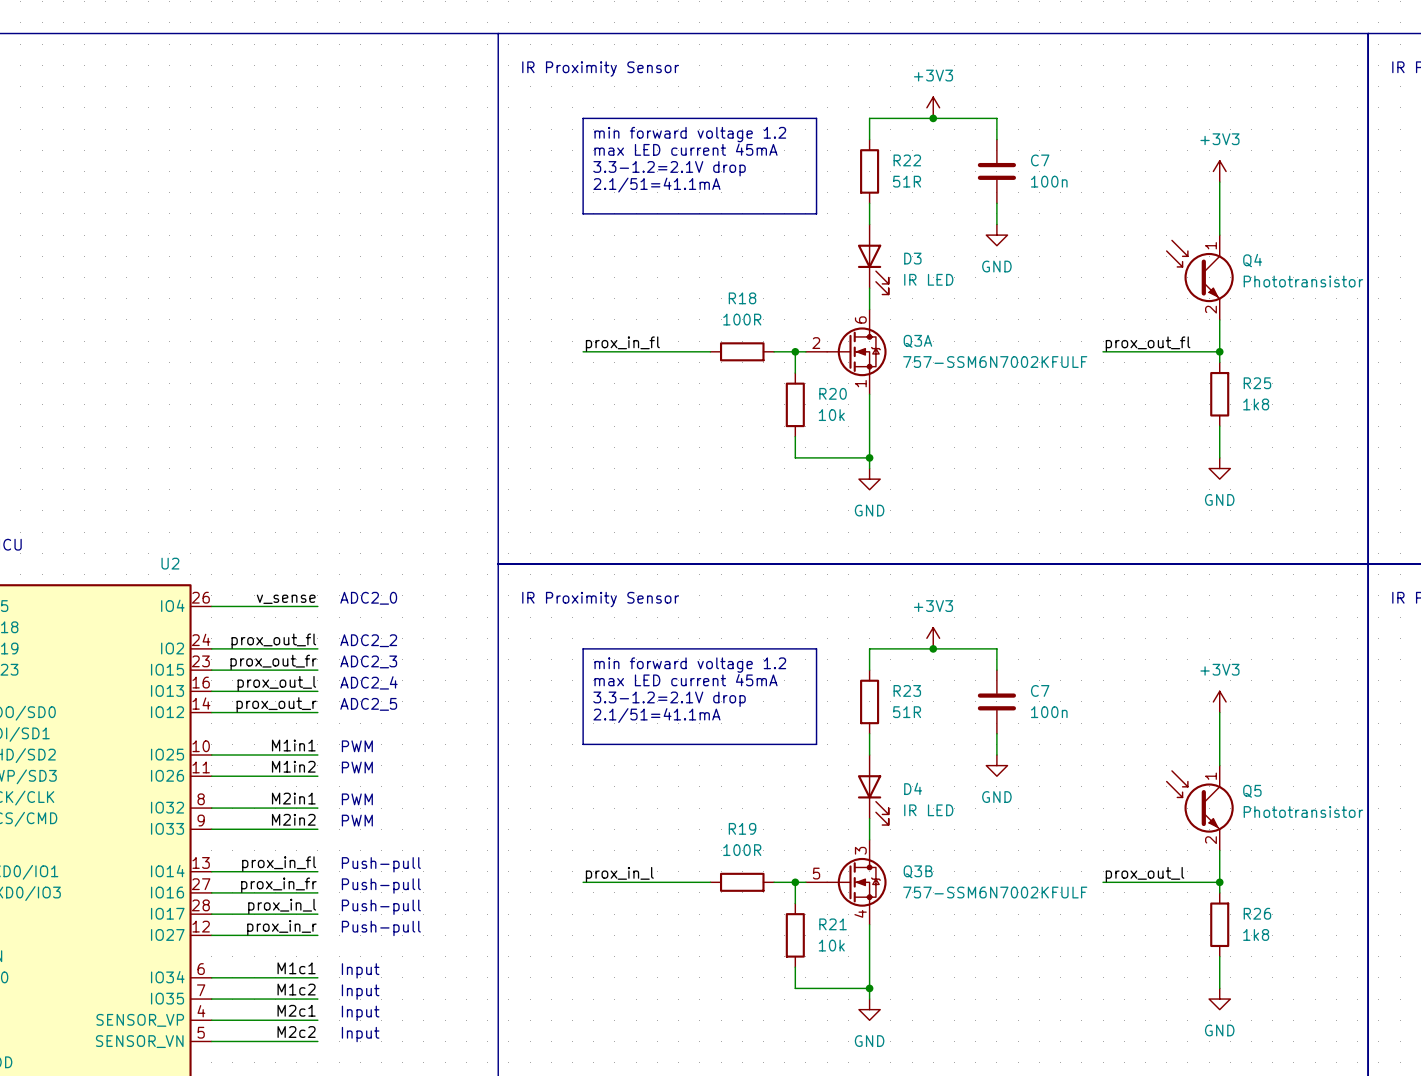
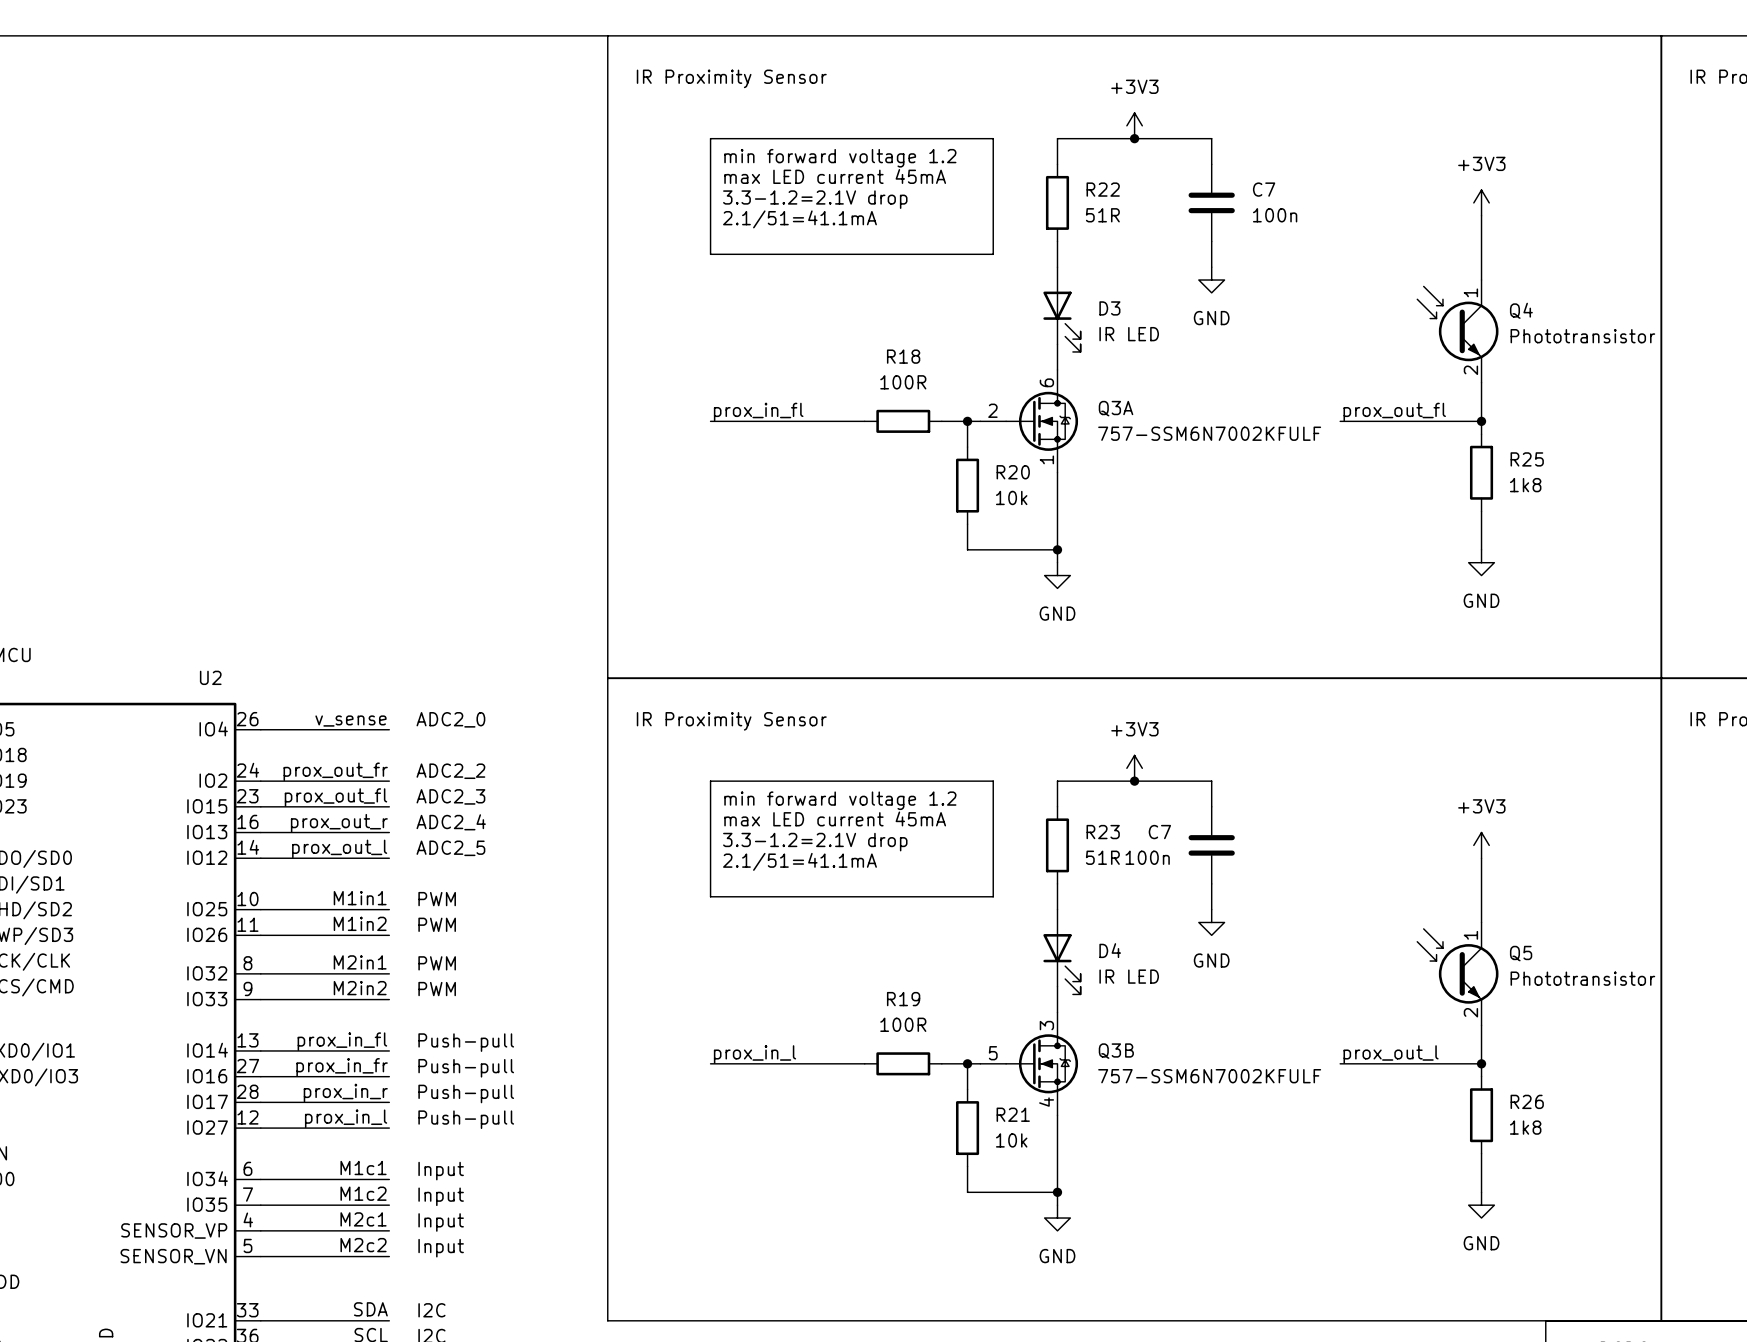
label: prox_out_fl (273, 641) -> prox_out_fr (335, 771)
label: prox_out_fr (273, 662) -> prox_out_fl (335, 797)
label: prox_out_l (276, 683) -> prox_out_r (339, 823)
C7 name position: C7 (1040, 690) -> C7 (1159, 832)
label: prox_out_r (276, 704) -> prox_out_l (339, 848)
C7 value position: 100n (1049, 712) -> 100n (1147, 857)
label: prox_in_l (282, 906) -> prox_in_r (345, 1093)
label: prox_in_r (281, 927) -> prox_in_l (346, 1118)

